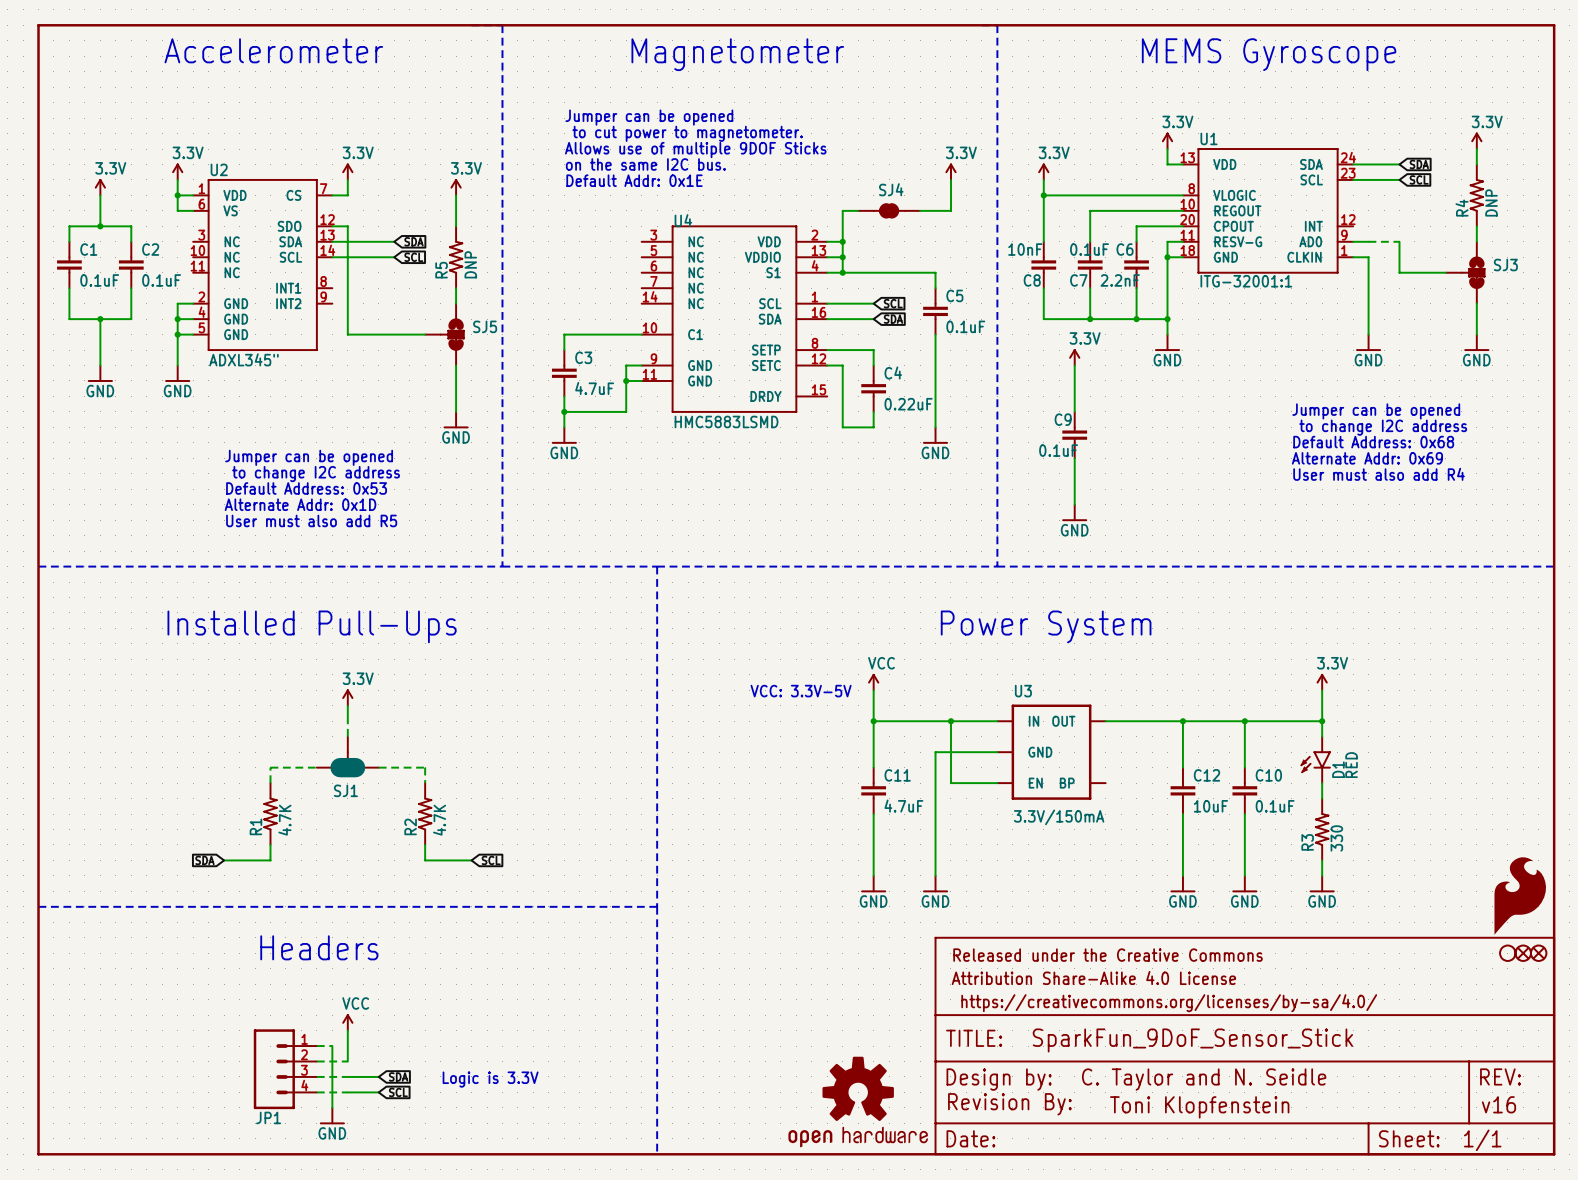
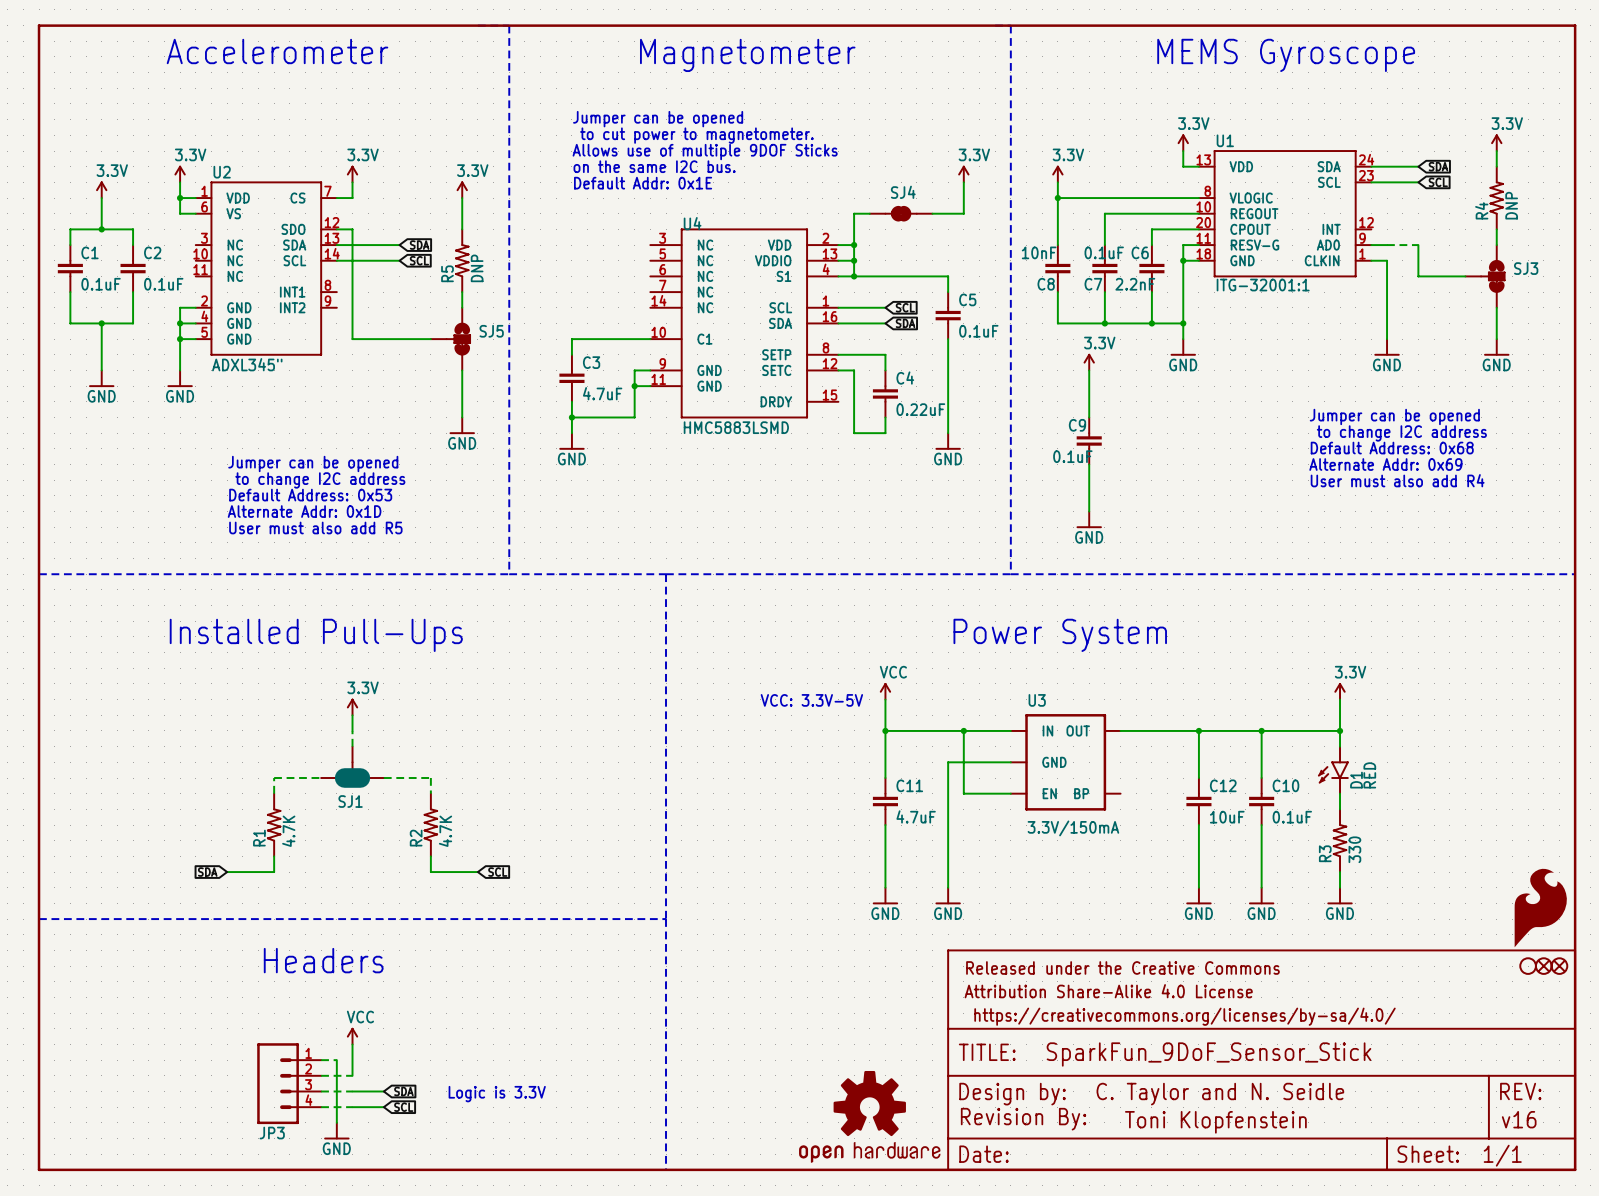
JP1 name: JP1 (268, 1117) -> JP3 (272, 1133)

